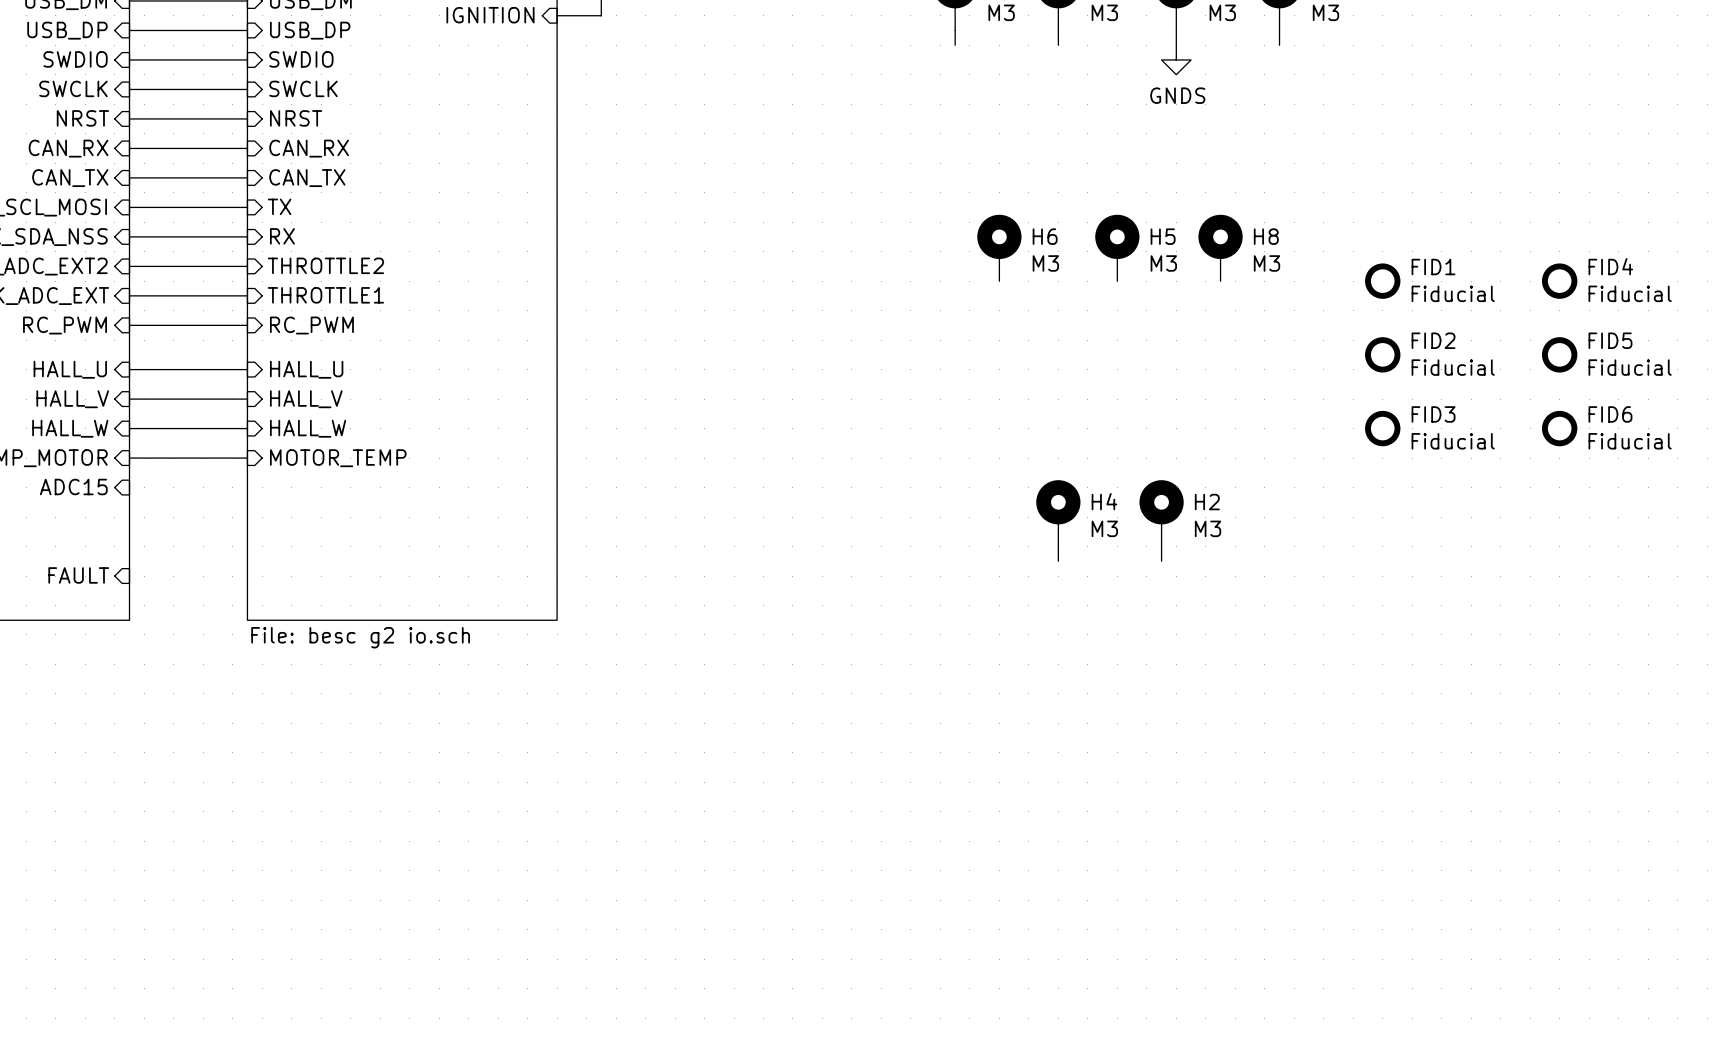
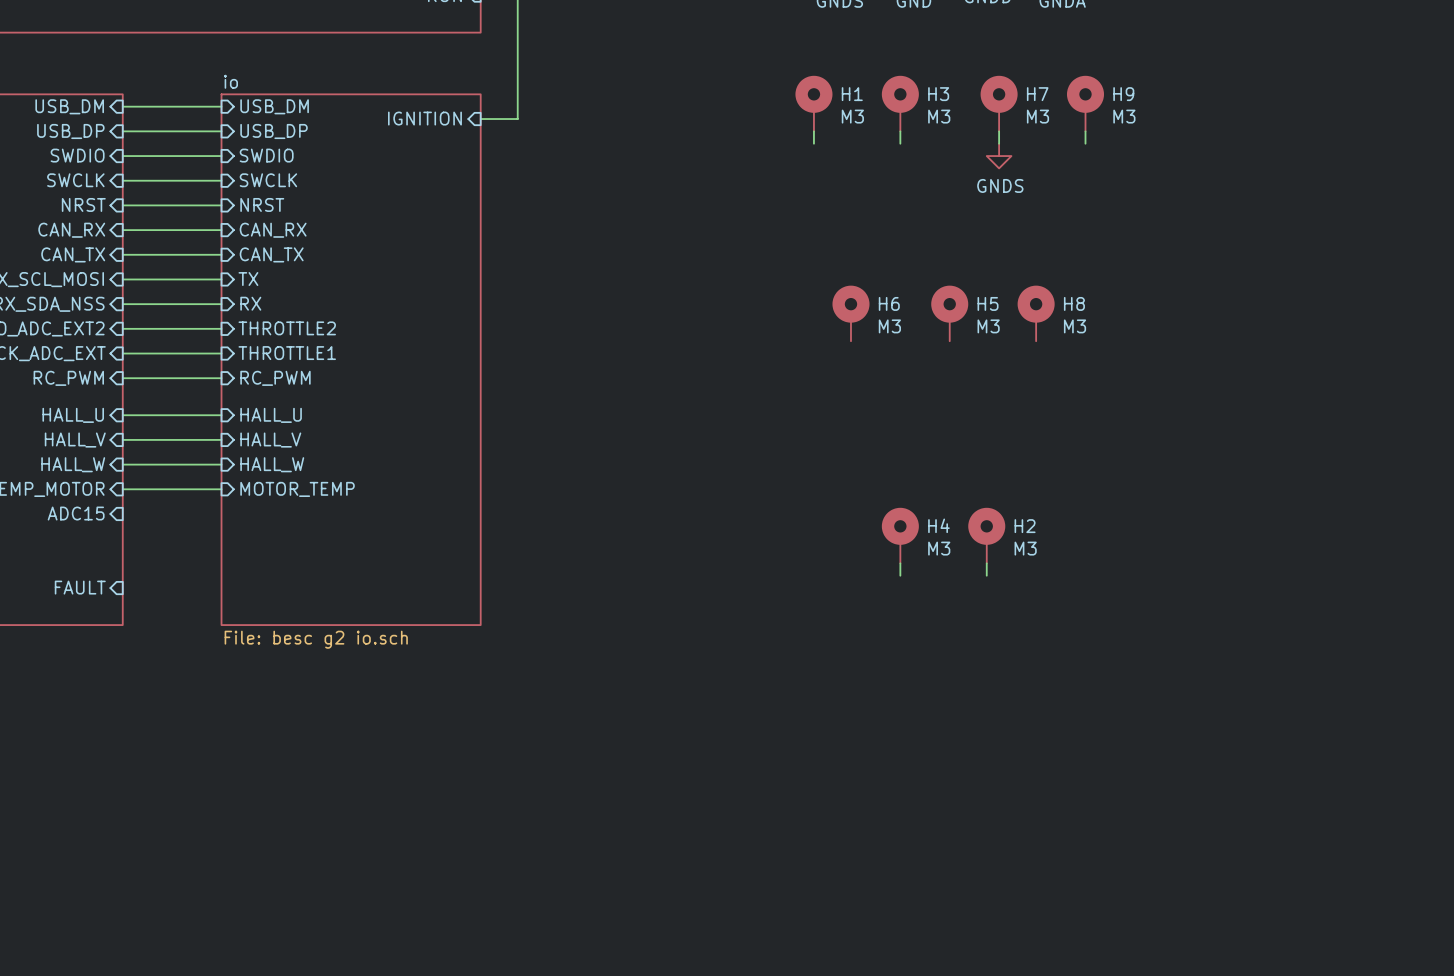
FID1: Fiducial (1382, 281) -> none
FID4: Fiducial (1559, 281) -> none
FID2: Fiducial (1382, 354) -> none
FID5: Fiducial (1559, 354) -> none
FID3: Fiducial (1382, 428) -> none
FID6: Fiducial (1559, 428) -> none

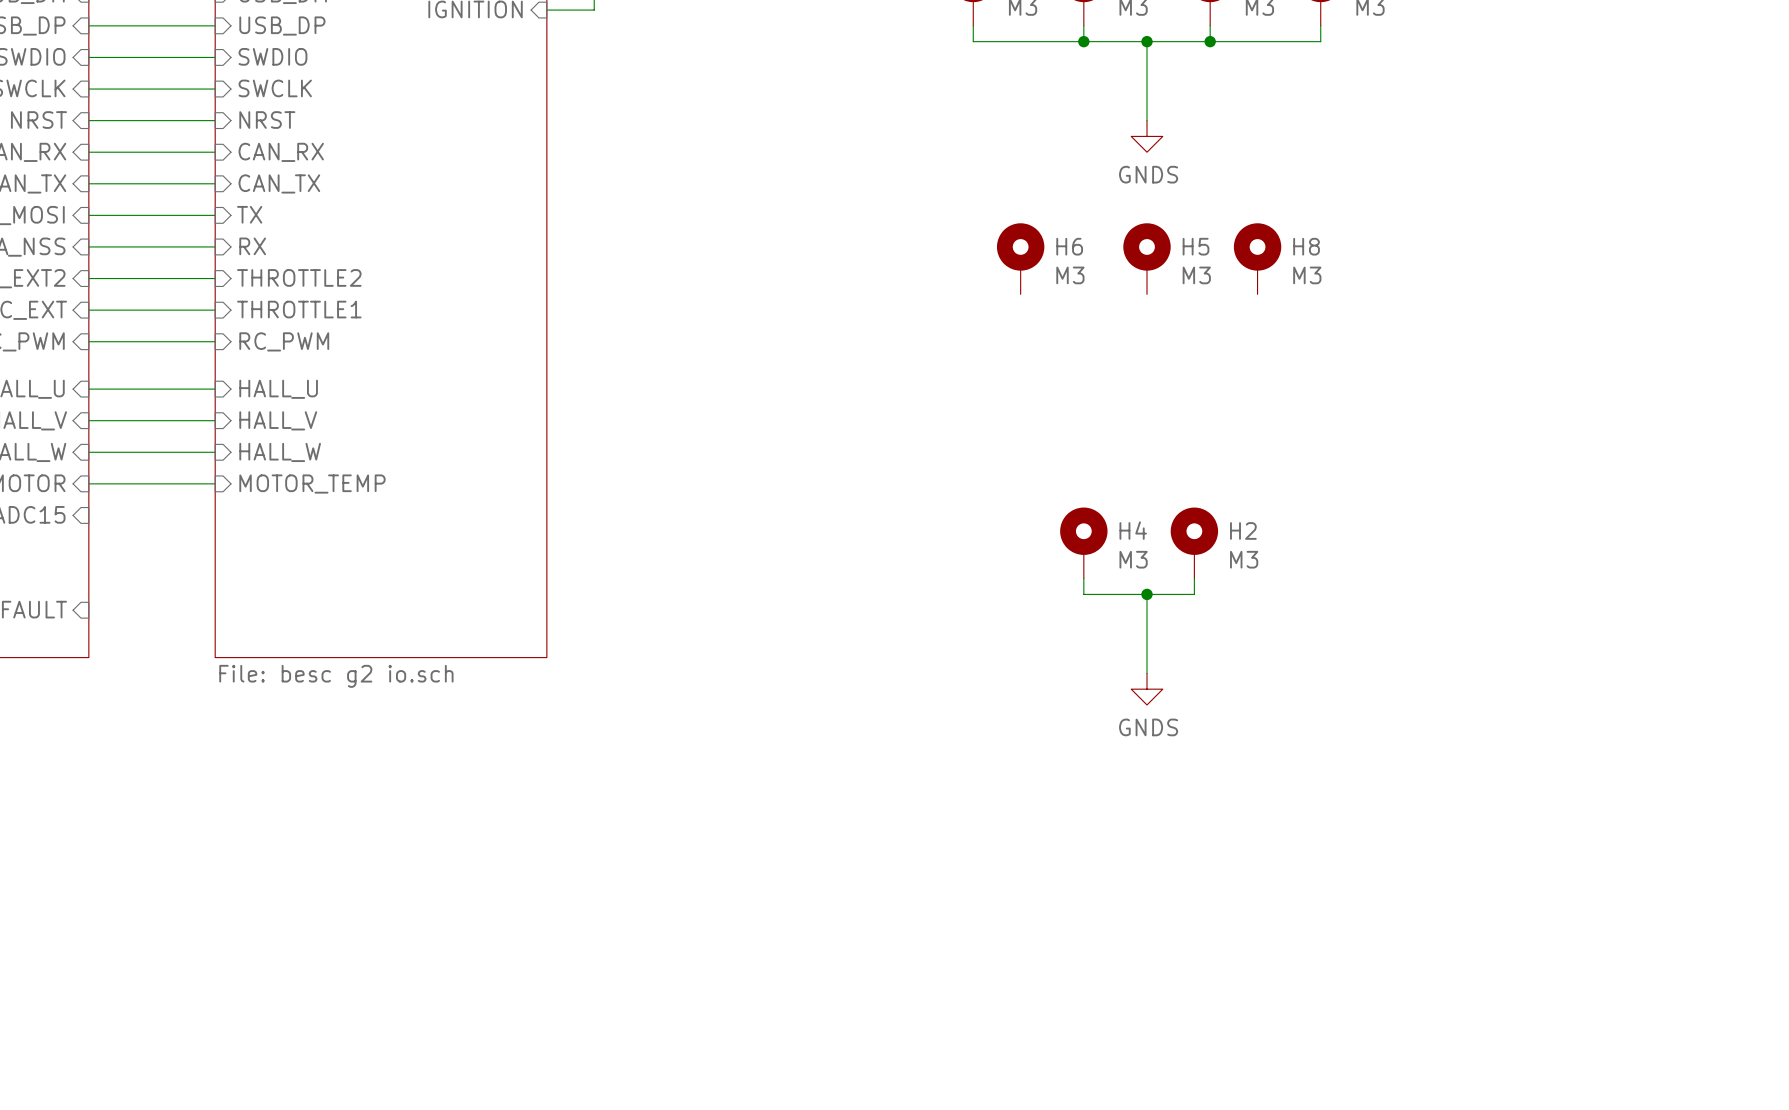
wire: none -> (973, 41) (1320, 41)
junction: none -> (1083, 41)
wire: none -> (1147, 41) (1147, 120)
junction: none -> (1147, 41)
junction: none -> (1210, 41)
power symbol position: GNDS (999, 156) -> GNDS (1147, 136)
wire: none -> (1083, 594) (1194, 594)
wire: none -> (1147, 594) (1147, 673)
junction: none -> (1147, 594)
power symbol: none -> GNDS (1147, 689)

